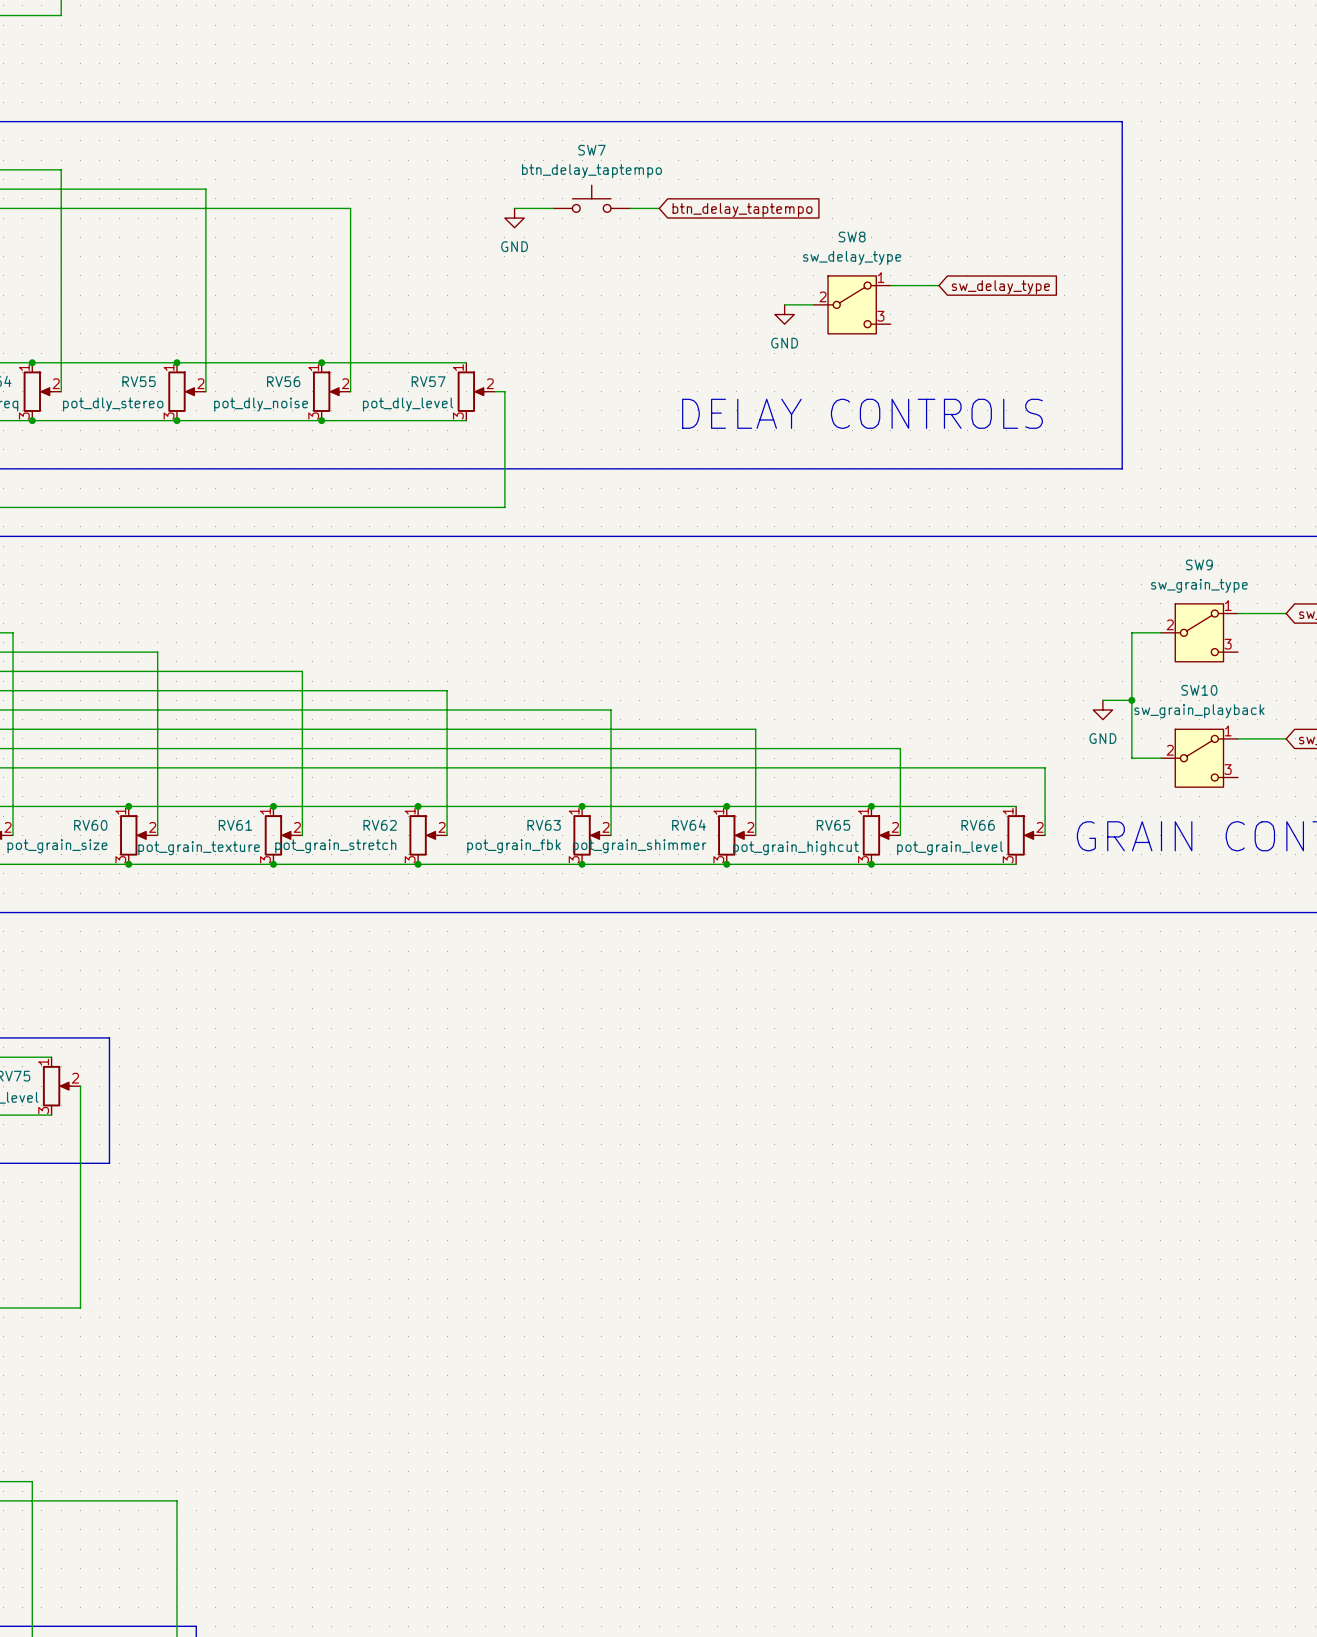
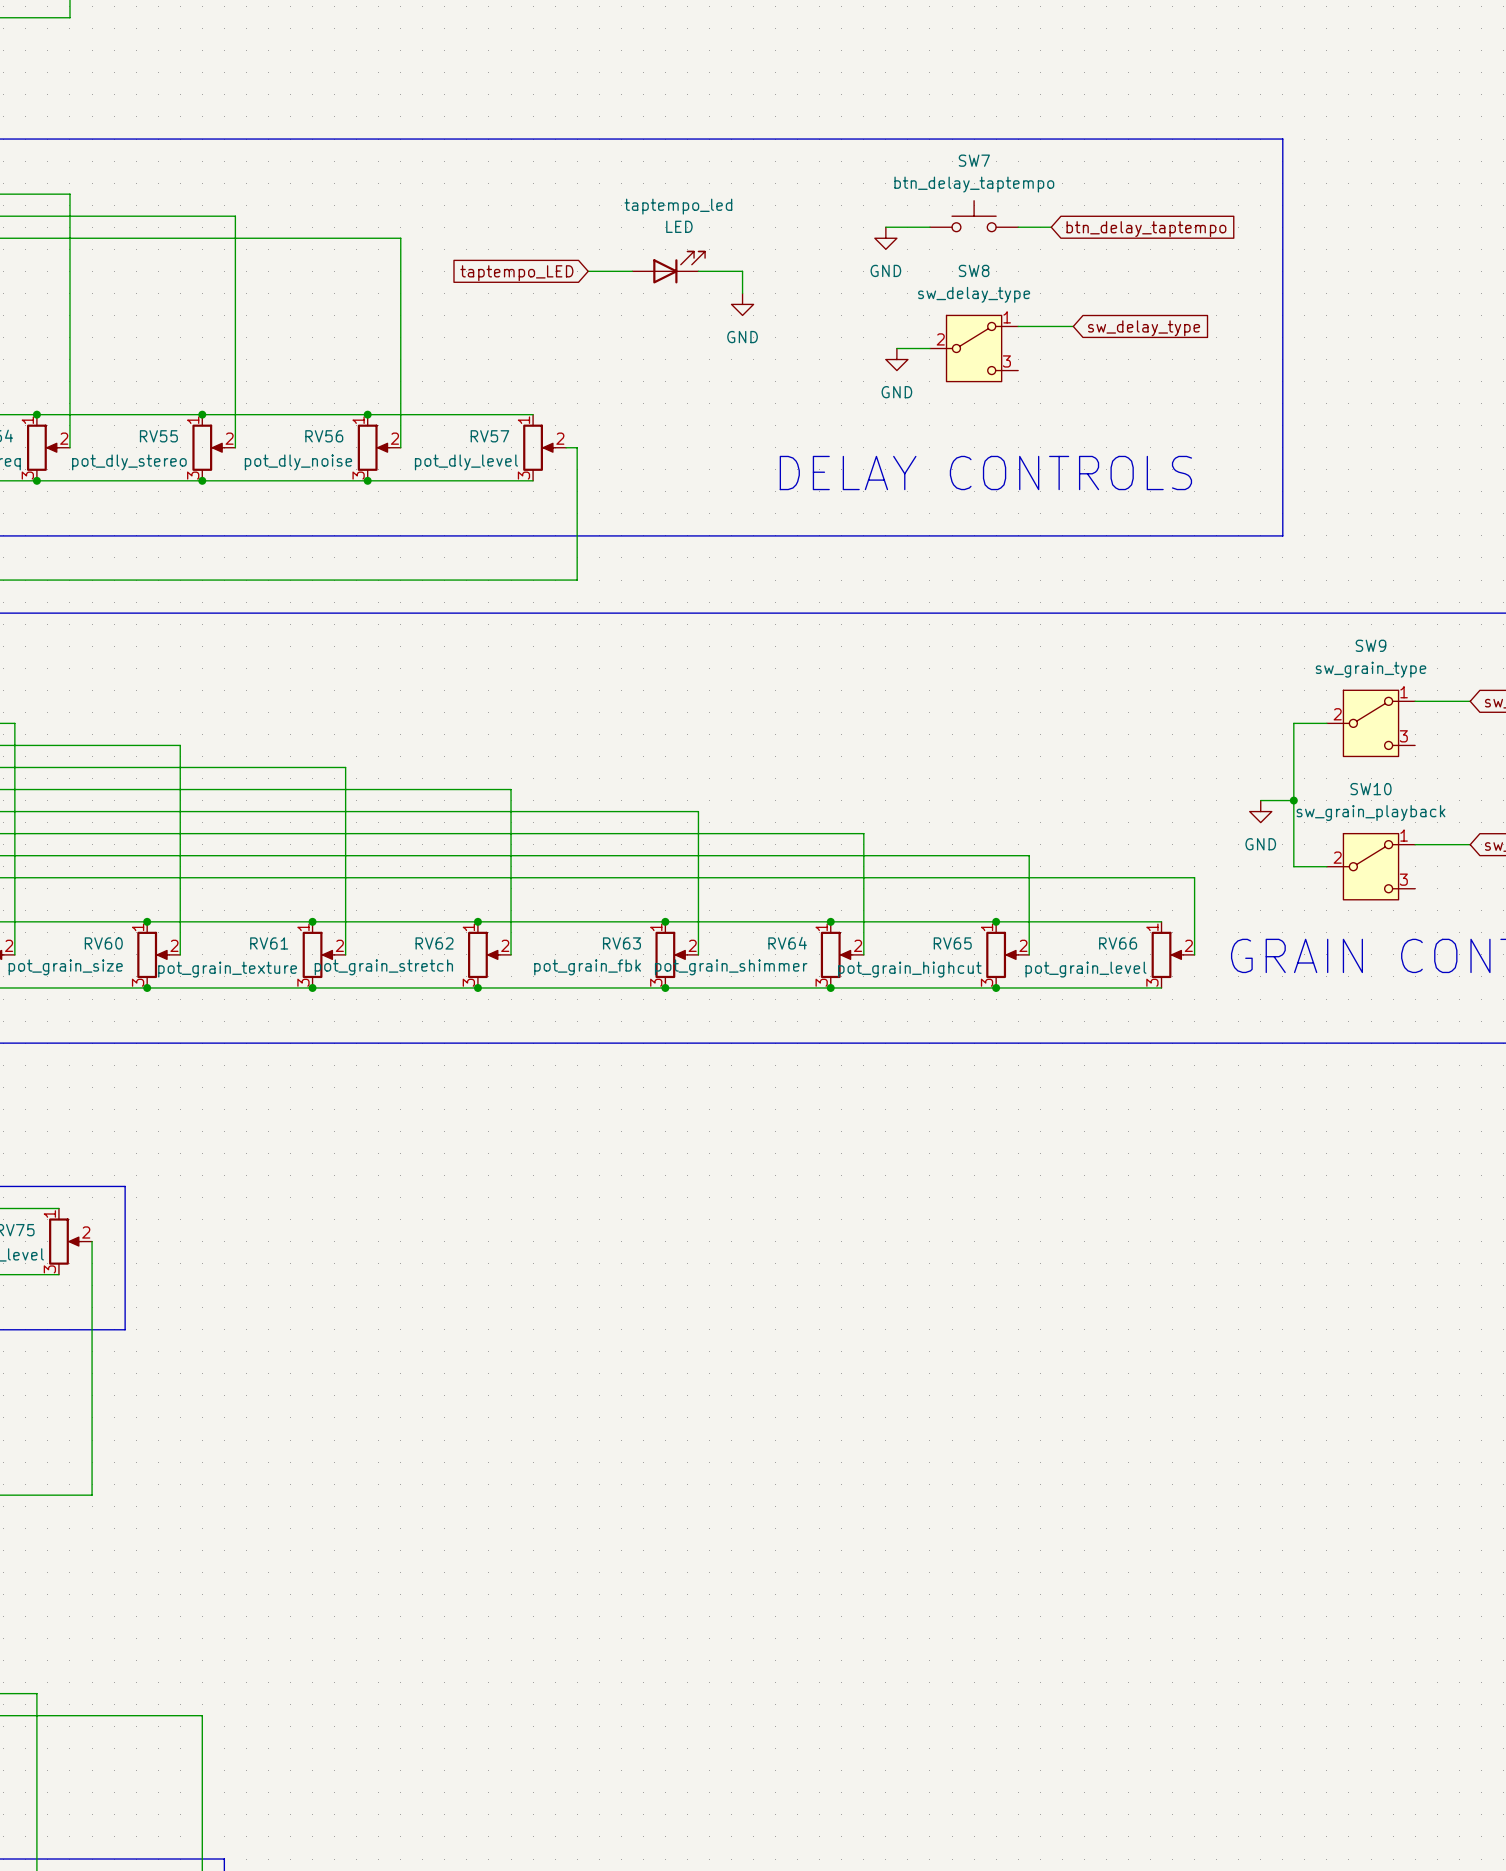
SW7 position: (591, 198) -> (974, 216)
wire: none -> (1018, 227) (1051, 227)
global label: none -> btn_delay_taptempo (1146, 229)
wire: (514, 208) (553, 208) -> (588, 271) (632, 271)
wire: (630, 208) (659, 208) -> none
power symbol: none -> GND (885, 238)
global label: btn_delay_taptempo (742, 210) -> none
power symbol: GND (514, 218) -> none
taptempo_led: none -> LED (668, 267)
wire: none -> (698, 271) (742, 271) (742, 293)
global label: none -> taptempo_LED (516, 273)
power symbol: none -> GND (742, 304)

